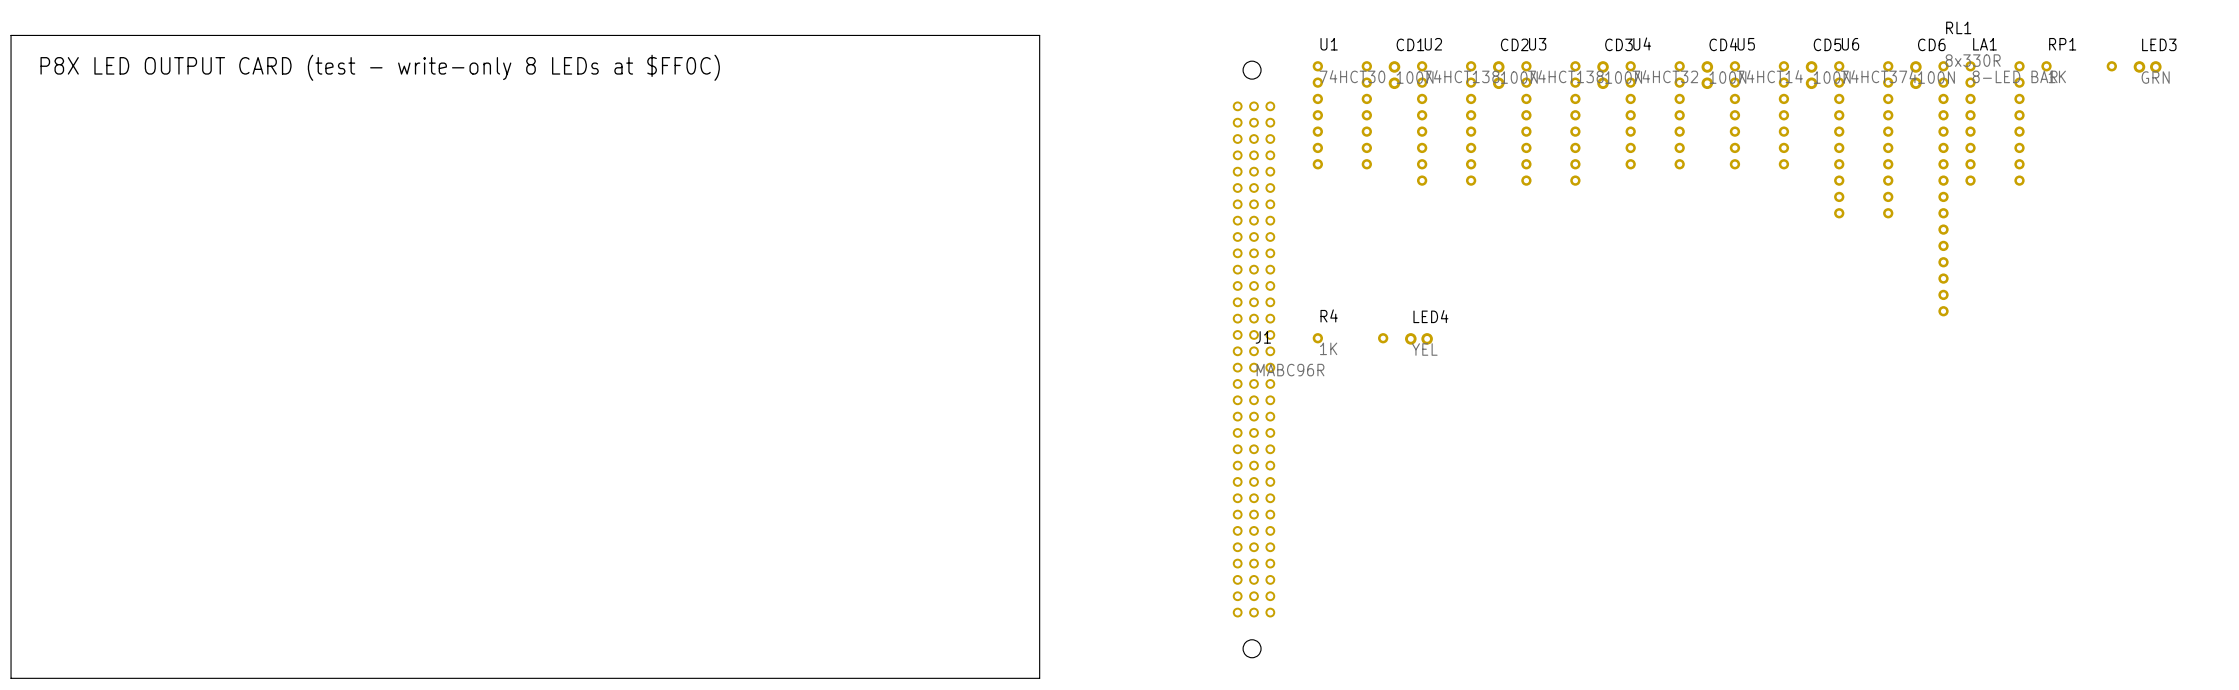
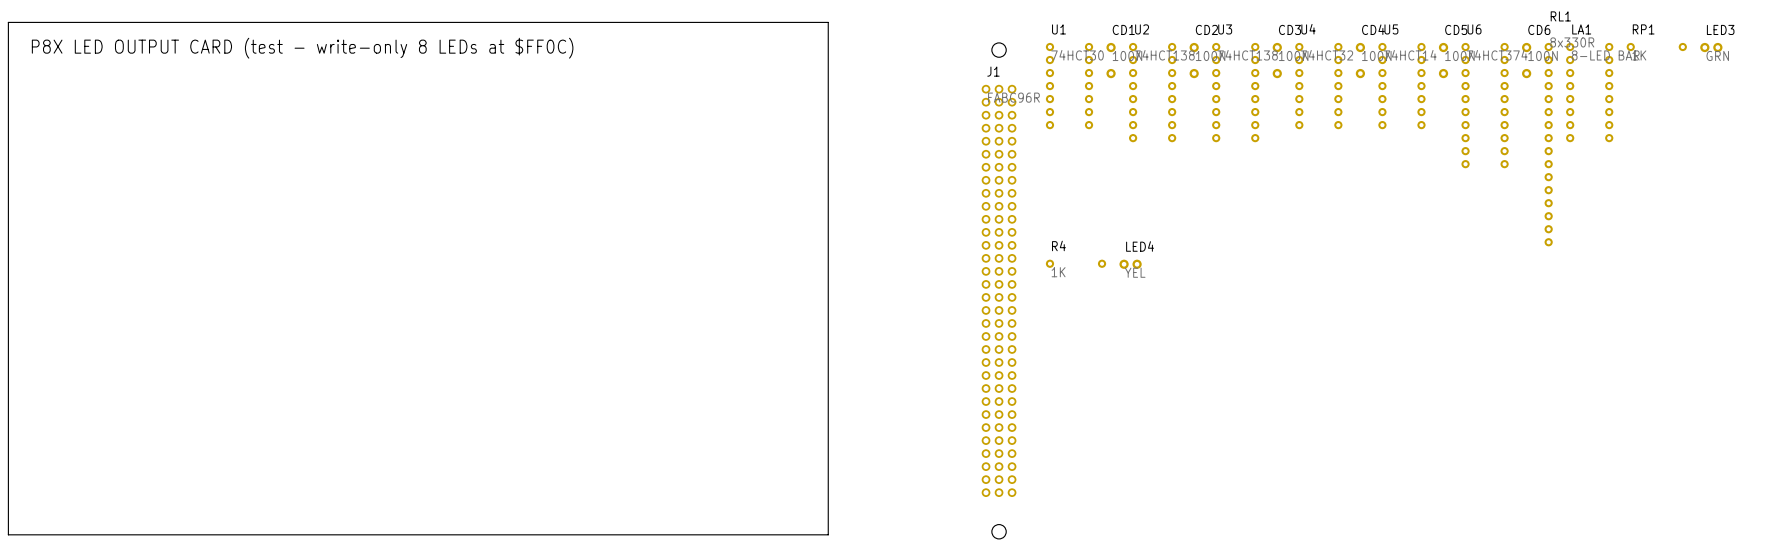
J1 footprint: [1232, 61, 1276, 658] -> [981, 42, 1017, 539]
CD1 footprint: [1388, 61, 1401, 90] -> [1106, 42, 1116, 79]
CD2 footprint: [1492, 61, 1505, 90] -> [1189, 42, 1199, 79]
CD3 footprint: [1597, 61, 1609, 90] -> [1272, 42, 1282, 79]
CD4 footprint: [1701, 61, 1714, 90] -> [1355, 42, 1366, 79]
CD5 footprint: [1805, 61, 1818, 90] -> [1438, 42, 1449, 79]
CD6 footprint: [1910, 61, 1922, 90] -> [1522, 42, 1532, 79]
J1 name position: J1 (1263, 337) -> J1 (993, 71)
J1 value: MABC96R (1290, 370) -> FABC96R (1013, 97)

